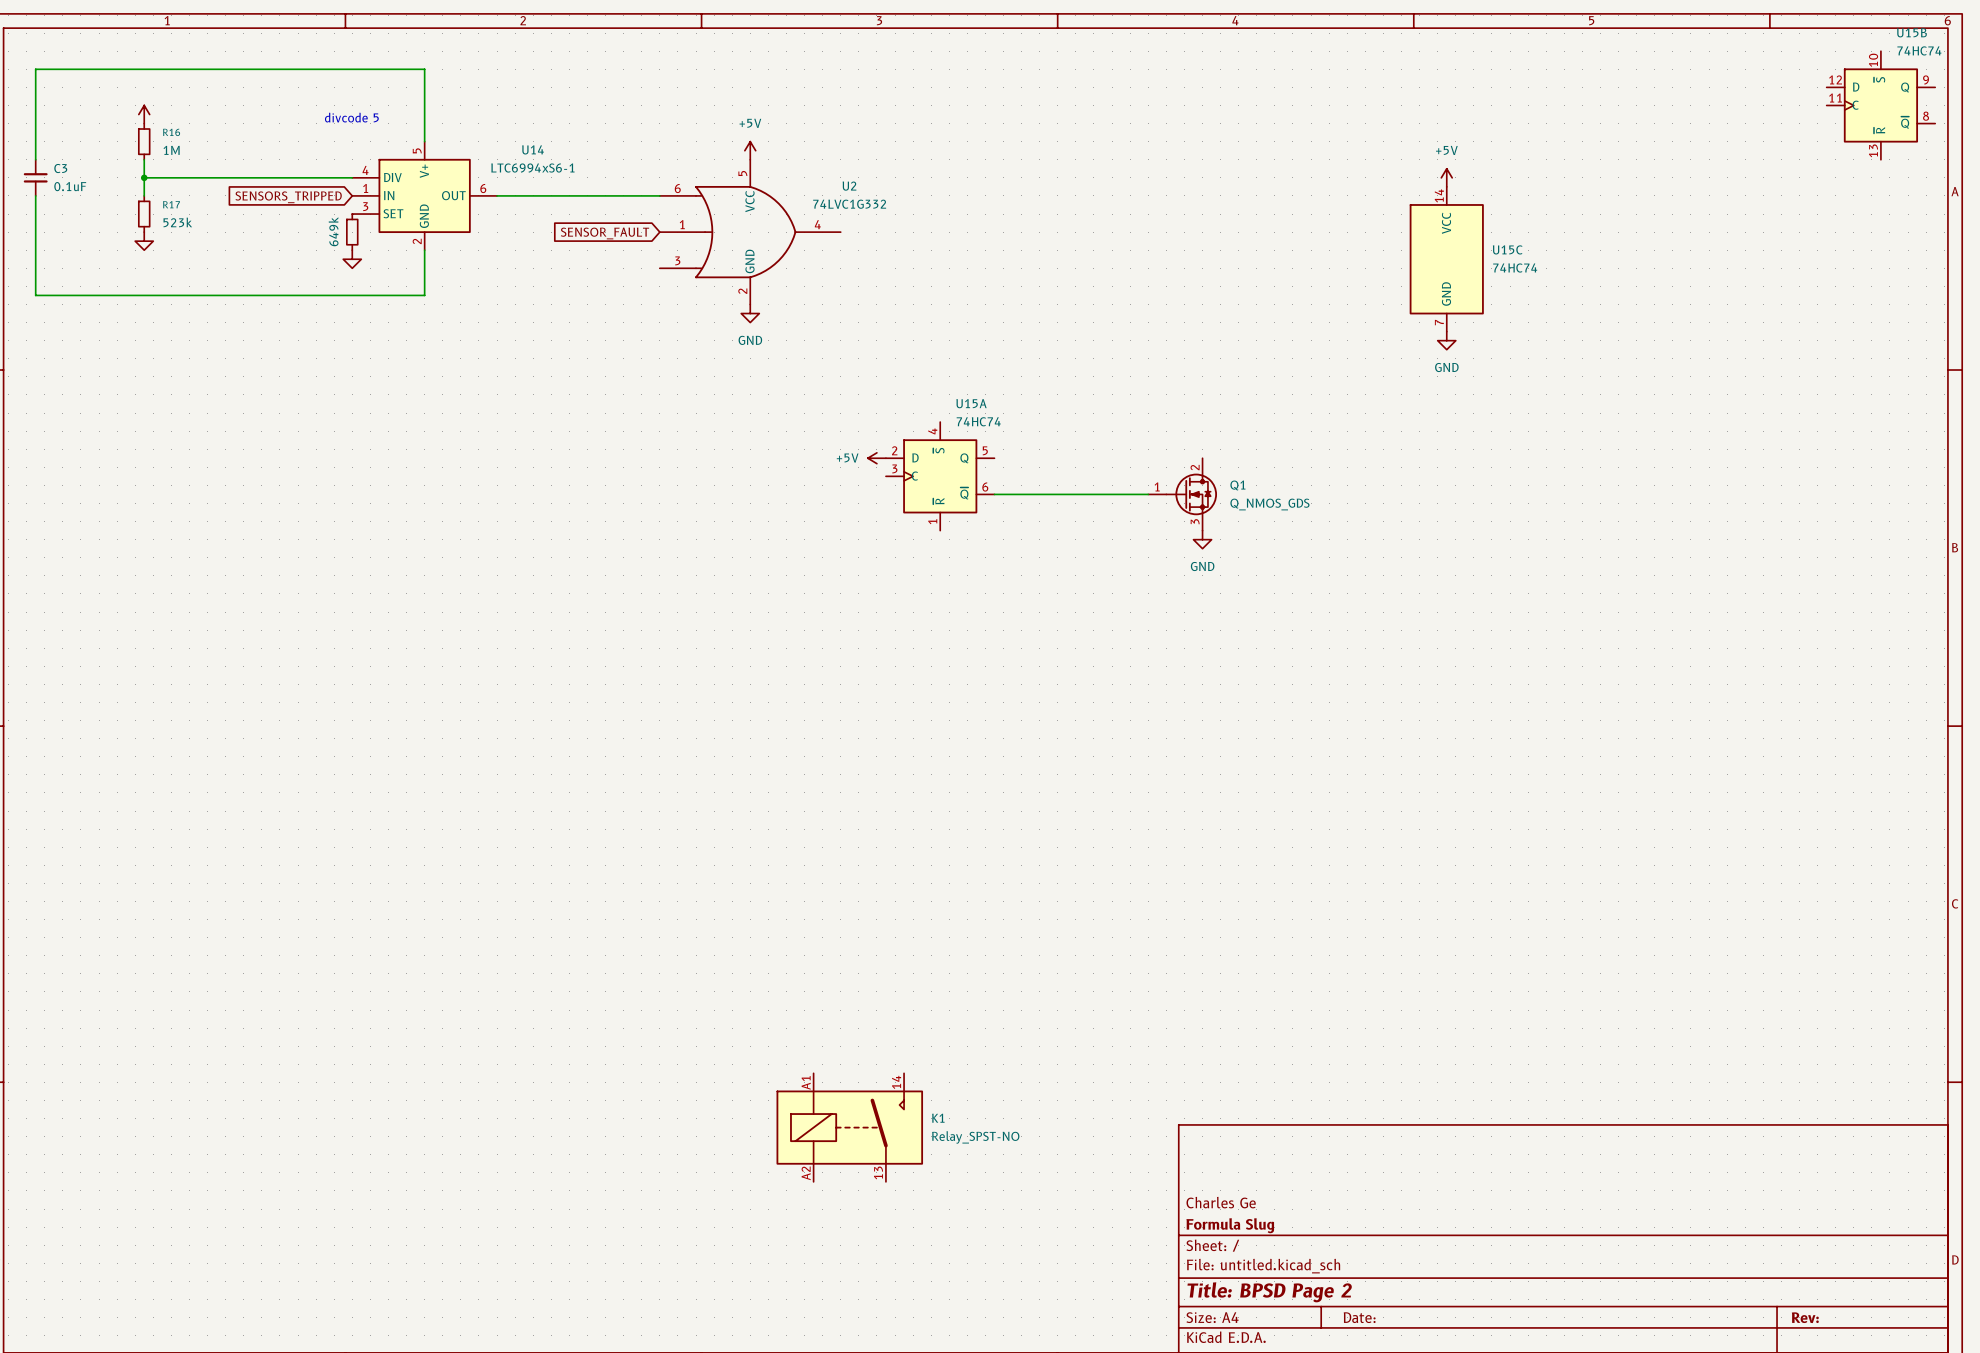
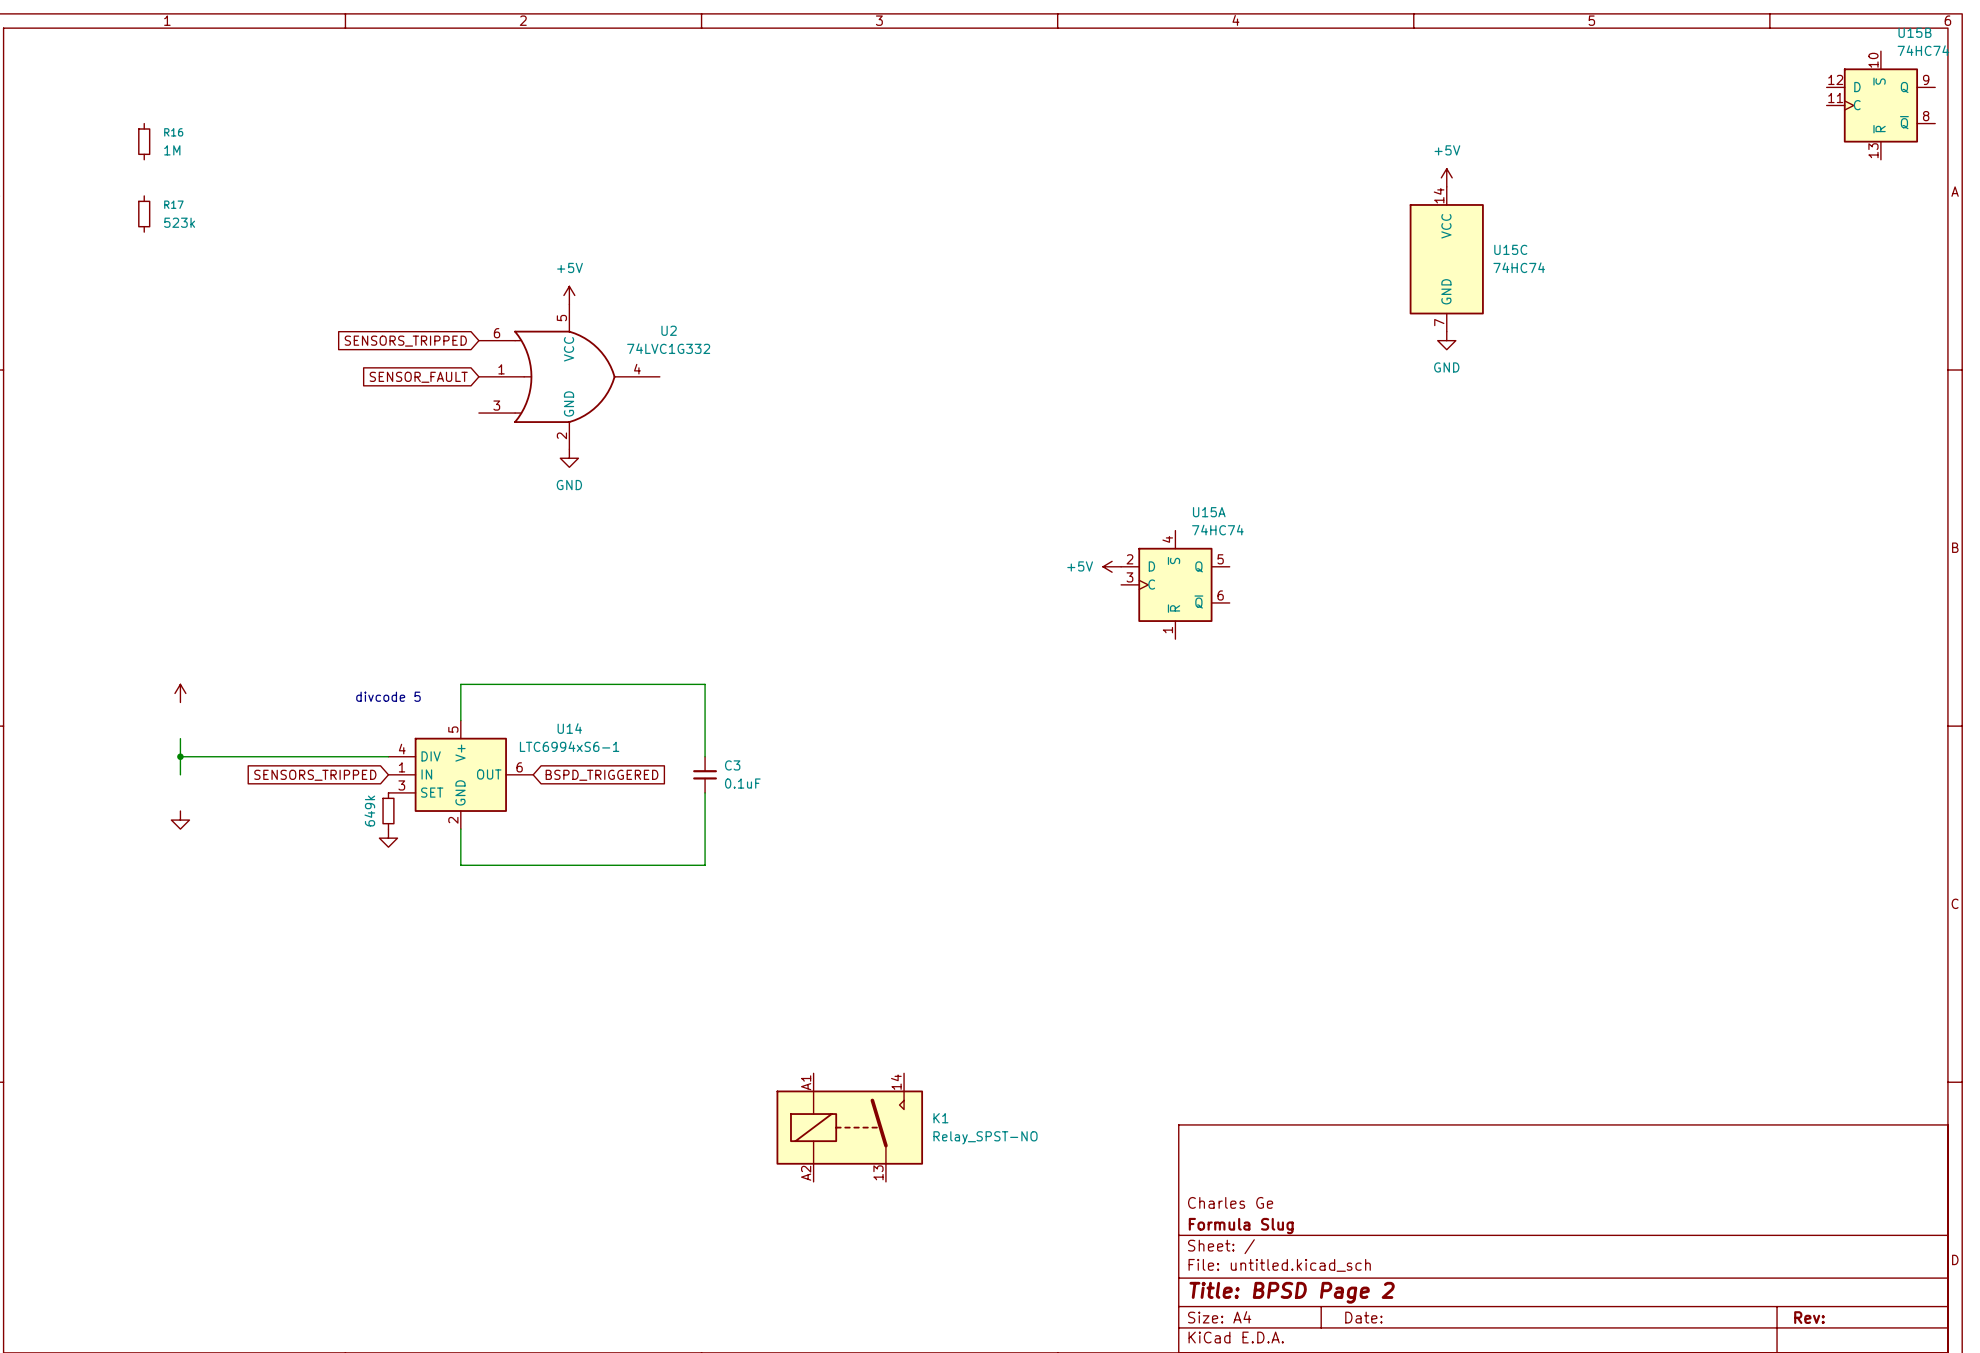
power symbol: (144, 114) -> none
text: divcode 5 (351, 117) -> none
wire: (424, 141) (424, 69) (35, 69) (35, 159) -> none
power symbol: +5V (750, 150) -> none
wire: (144, 159) (144, 195) -> none
C3 position: (35, 177) -> (705, 774)
wire: (144, 177) (352, 177) -> none
junction: (144, 177) -> none
wire: (35, 195) (35, 295) (424, 295) (424, 250) -> none
U14 position: (424, 195) -> (460, 774)
wire: (497, 195) (659, 195) -> none
global label: SENSORS_TRIPPED (288, 197) -> none
part: 649k (352, 232) -> none
U2 position: (750, 232) -> (569, 376)
global label: SENSOR_FAULT (605, 233) -> none
power symbol: (144, 241) -> none
power symbol: (352, 259) -> none
power symbol: none -> +5V (569, 295)
power symbol: GND (750, 313) -> none
global label: none -> SENSORS_TRIPPED (405, 341)
global label: none -> SENSOR_FAULT (418, 377)
power symbol: none -> GND (569, 458)
power symbol: +5V (876, 458) -> none
U15A position: (940, 476) -> (1175, 584)
wire: (994, 494) (1148, 494) -> none
Q1: Q_NMOS_GDS (1182, 494) -> none
power symbol: GND (1202, 539) -> none
power symbol: none -> +5V (1112, 566)
power symbol: none -> (180, 693)
text: none -> divcode 5 (388, 696)
wire: none -> (460, 720) (460, 684) (705, 684) (705, 756)
wire: none -> (180, 738) (180, 774)
wire: none -> (180, 756) (388, 756)
junction: none -> (180, 756)
global label: none -> SENSORS_TRIPPED (315, 775)
global label: none -> BSPD_TRIGGERED (602, 775)
wire: none -> (705, 792) (705, 865) (460, 865) (460, 829)
part: none -> 649k (388, 811)
power symbol: none -> (180, 820)
power symbol: none -> (388, 838)

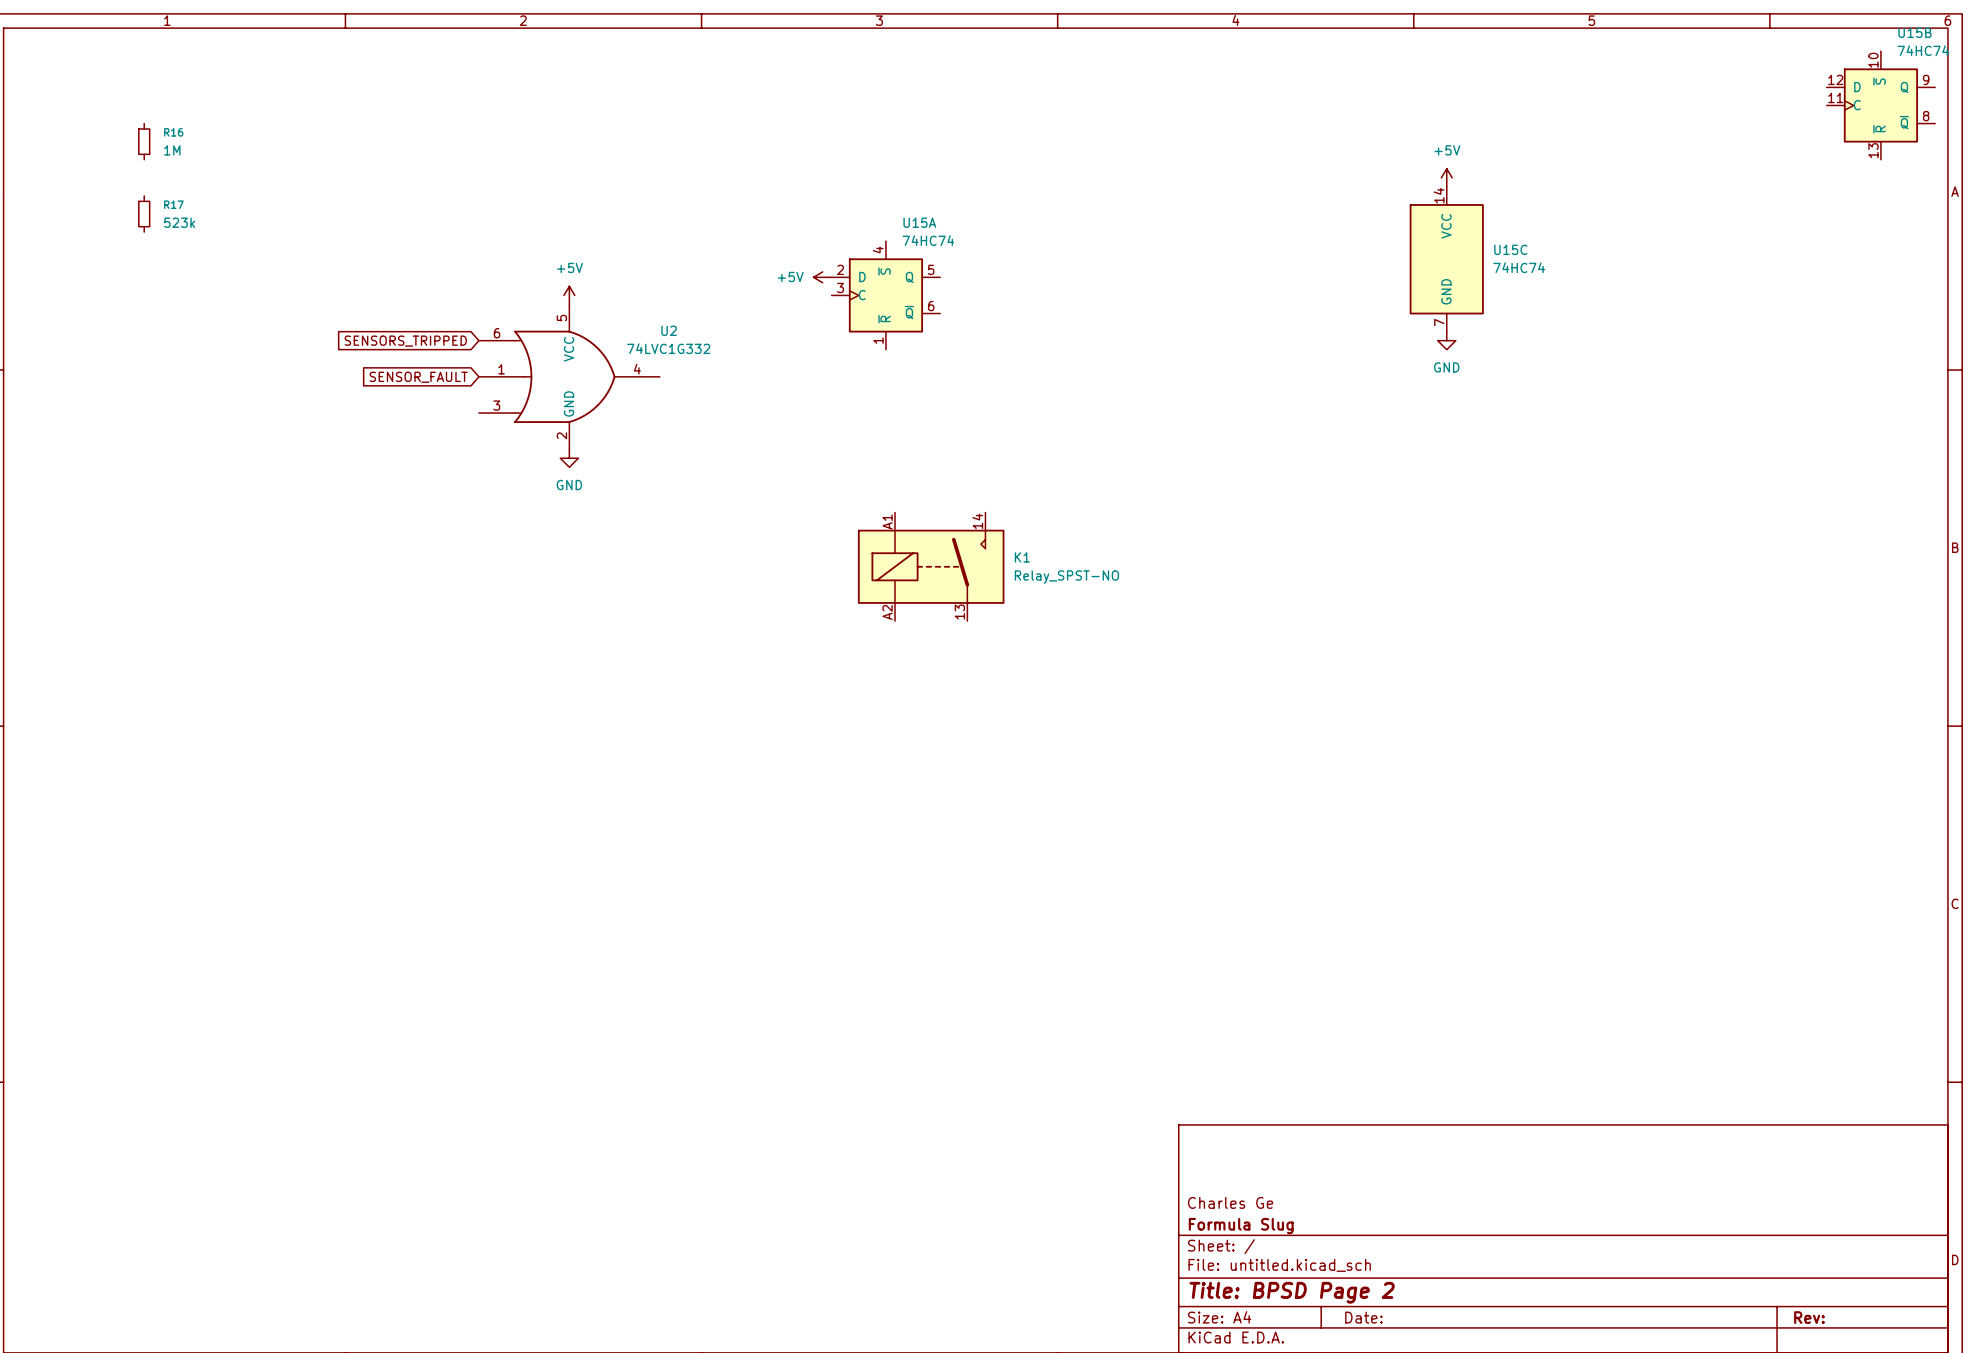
power symbol: none -> +5V (822, 277)
power symbol: +5V (1112, 566) -> none
U15A position: (1175, 584) -> (885, 295)
power symbol: (180, 693) -> none
text: divcode 5 (388, 696) -> none
wire: (460, 720) (460, 684) (705, 684) (705, 756) -> none
wire: (180, 738) (180, 774) -> none
wire: (180, 756) (388, 756) -> none
junction: (180, 756) -> none
U14: LTC6994xS6-1 (460, 774) -> none
C3: 0.1uF (705, 774) -> none
global label: SENSORS_TRIPPED (315, 775) -> none
global label: BSPD_TRIGGERED (602, 775) -> none
wire: (705, 792) (705, 865) (460, 865) (460, 829) -> none
part: 649k (388, 811) -> none
power symbol: (180, 820) -> none
power symbol: (388, 838) -> none
K1 position: (849, 1127) -> (931, 566)

